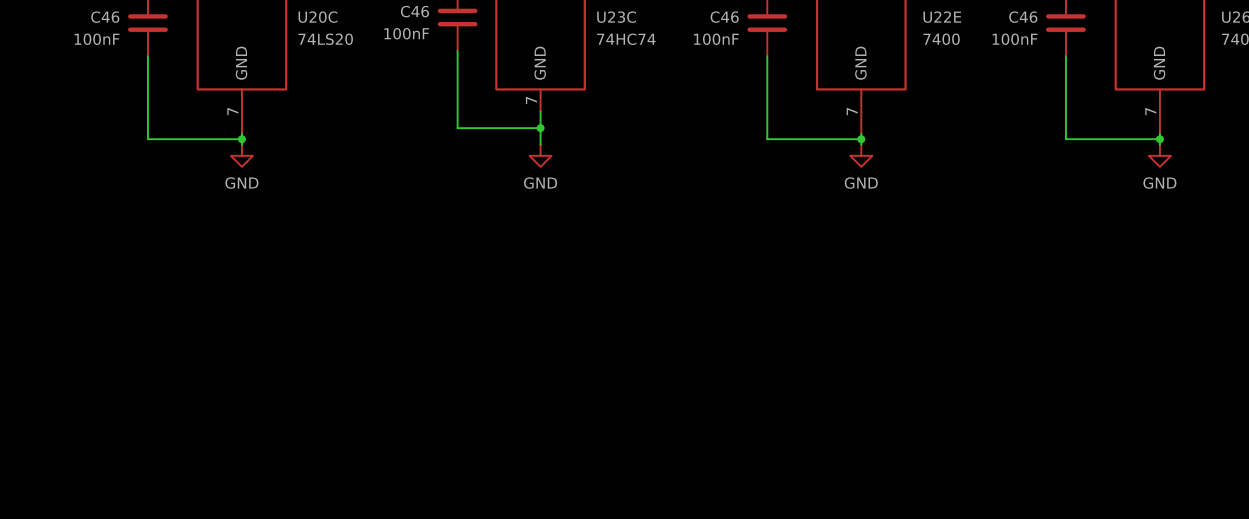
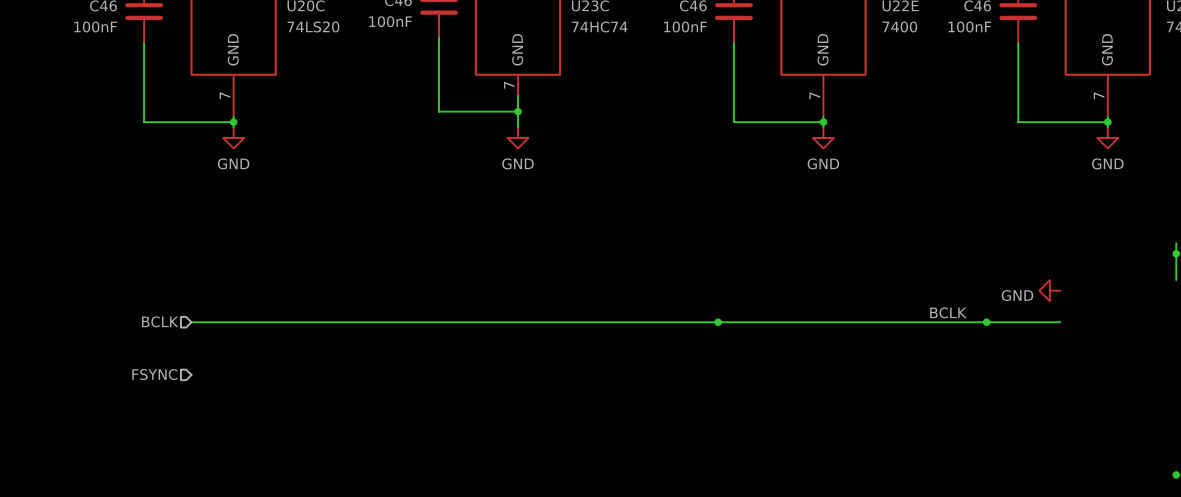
wire: none -> (1176, 243) (1176, 280)
junction: none -> (1176, 253)
power symbol: none -> GND (1049, 290)
label: none -> BCLK (948, 312)
hierarchical label: none -> BCLK (160, 321)
wire: none -> (191, 322) (1060, 322)
junction: none -> (718, 322)
junction: none -> (986, 322)
hierarchical label: none -> FSYNC (154, 374)
junction: none -> (1176, 474)

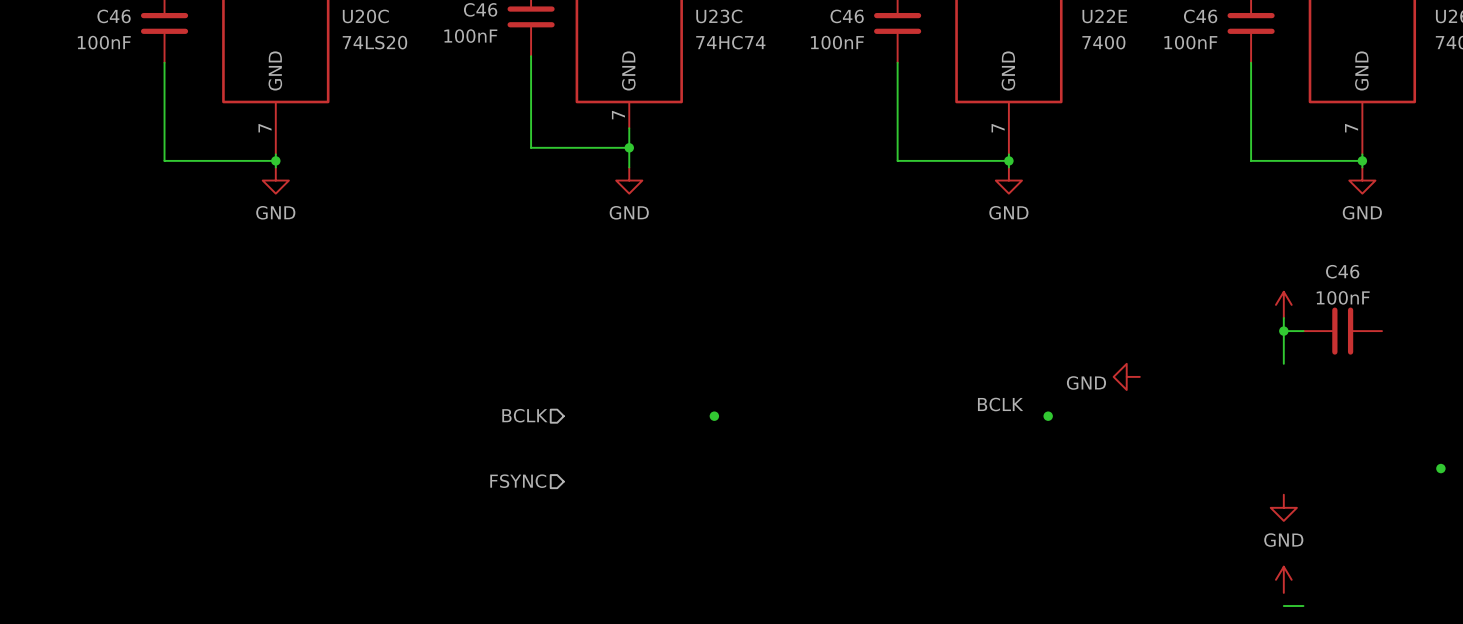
power symbol: none -> (1283, 304)
wire: (1176, 243) (1176, 280) -> (1283, 318) (1283, 363)
junction: (1176, 253) -> none
wire: none -> (1283, 331) (1303, 331)
junction: none -> (1283, 331)
C46: none -> 100nF (1342, 331)
power symbol: GND (1049, 290) -> none
power symbol: none -> GND (1126, 376)
label position: BCLK (948, 312) -> BCLK (1000, 404)
hierarchical label: BCLK (160, 321) -> none
wire: (191, 322) (1060, 322) -> none
junction: (718, 322) -> none
junction: (986, 322) -> none
hierarchical label: none -> BCLK (524, 415)
junction: none -> (714, 416)
junction: none -> (1048, 416)
junction: none -> (1440, 468)
hierarchical label: FSYNC (154, 374) -> none
hierarchical label: none -> FSYNC (518, 481)
power symbol: none -> GND (1283, 507)
power symbol: none -> (1283, 579)
junction: (1176, 474) -> none
wire: none -> (1283, 606) (1303, 606)

